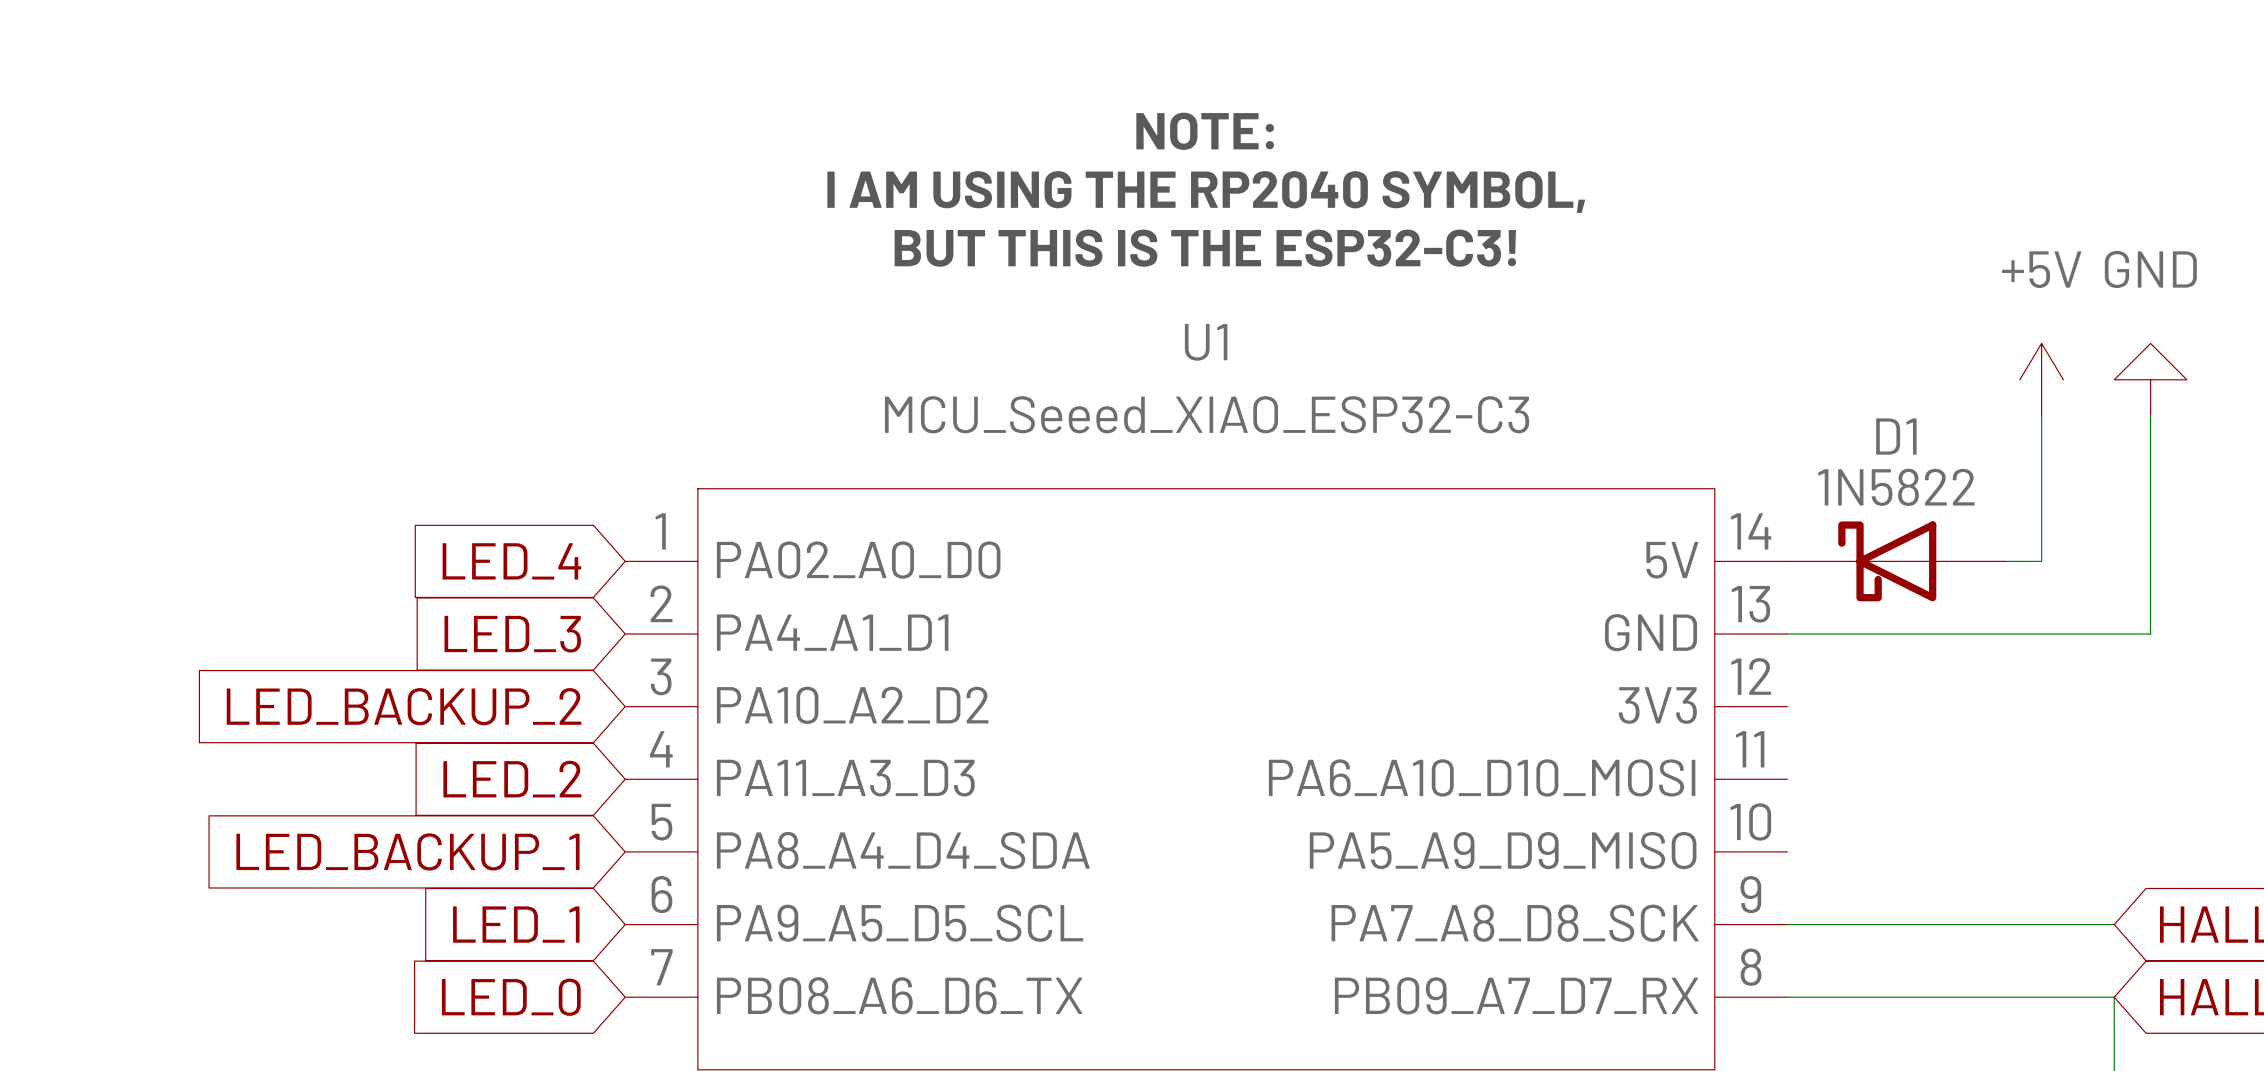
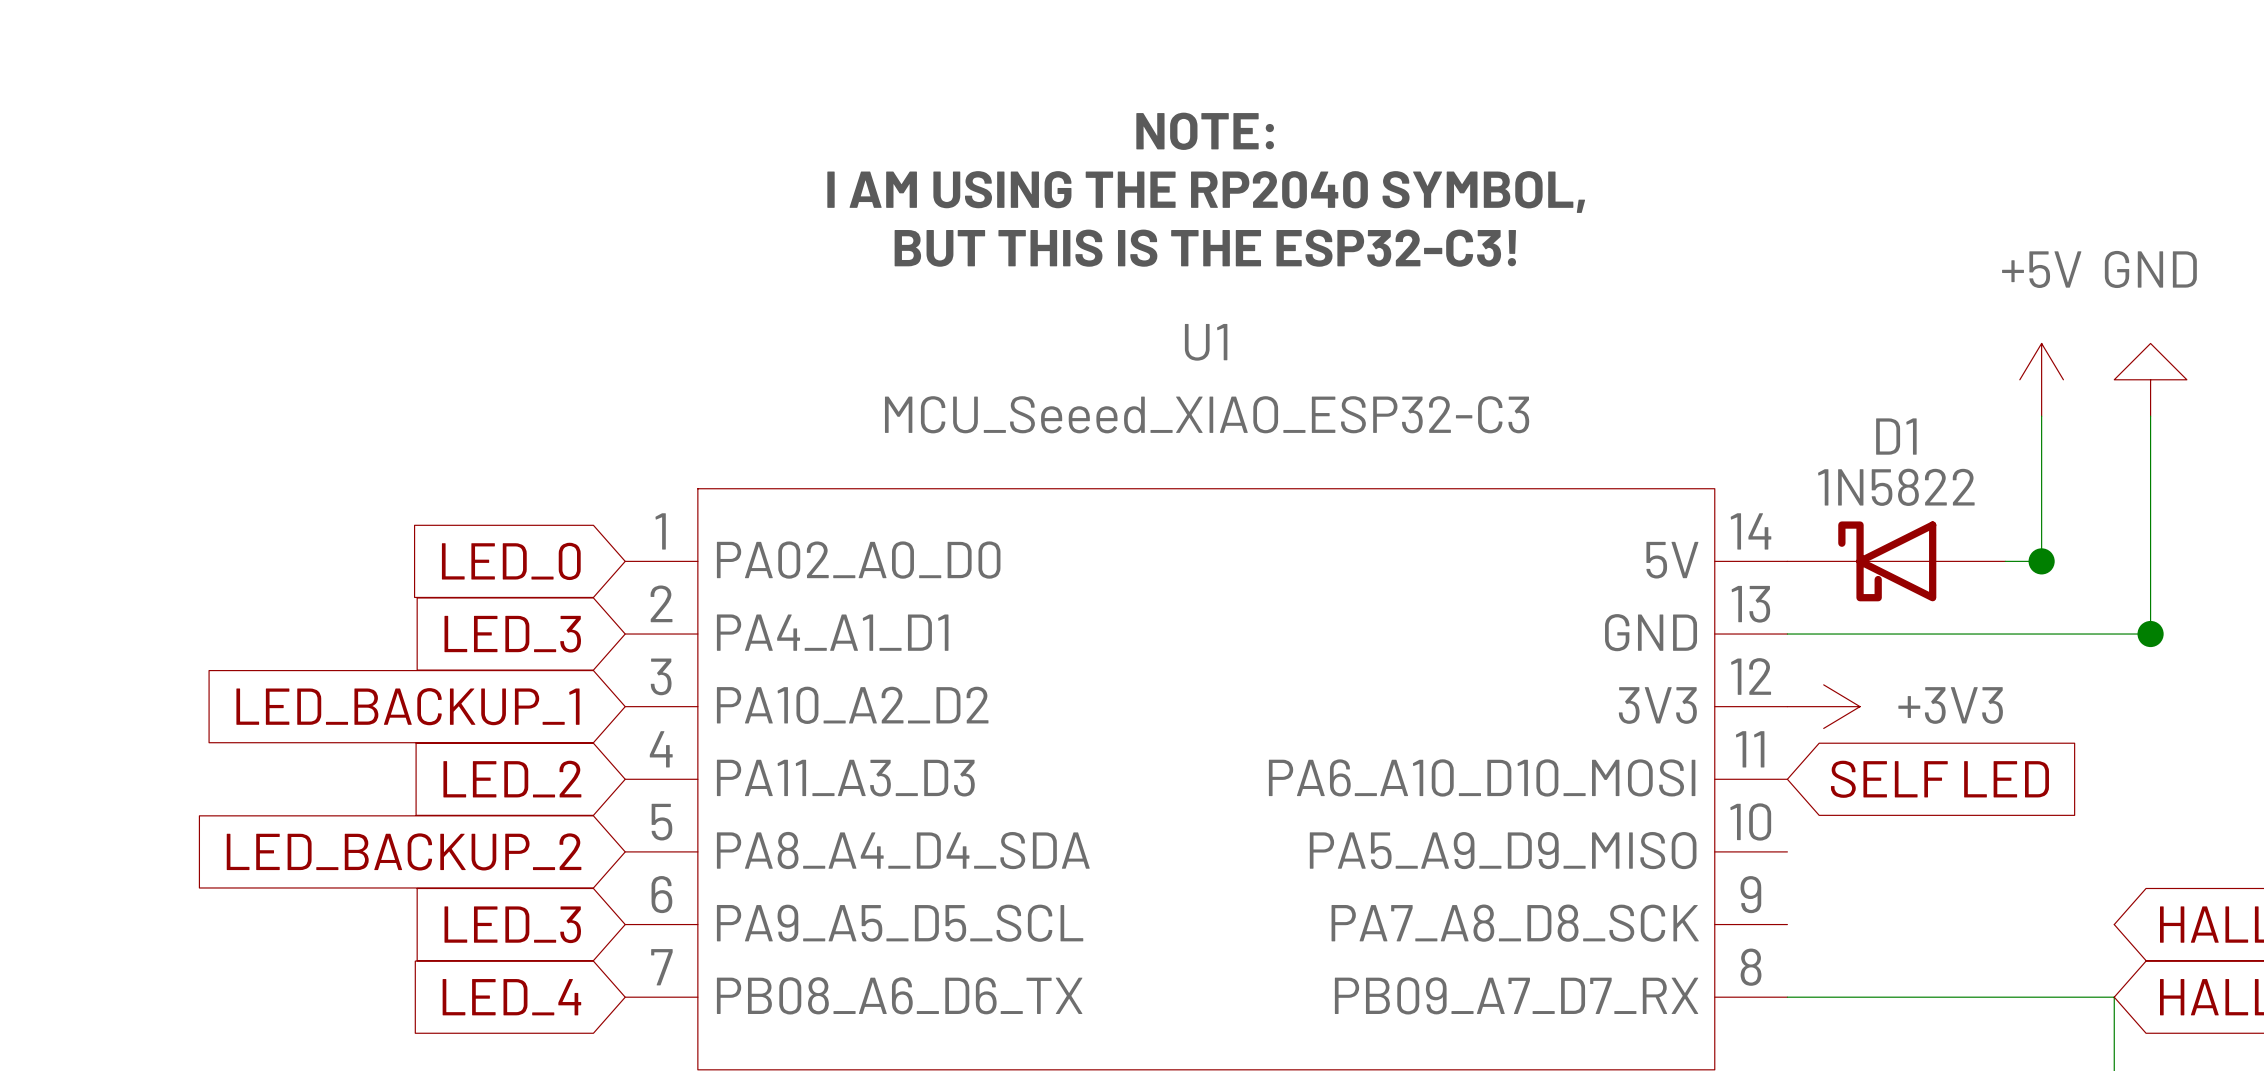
global label: LED_4 (511, 561) -> LED_0 (511, 561)
junction: none -> (2041, 561)
junction: none -> (2150, 634)
global label: LED_BACKUP_2 (404, 706) -> LED_BACKUP_1 (407, 706)
power symbol: none -> +3V3 (1823, 706)
global label: none -> SELF LED (1939, 779)
global label: LED_BACKUP_1 (407, 851) -> LED_BACKUP_2 (404, 851)
global label: LED_1 (516, 924) -> LED_3 (512, 924)
wire: (1787, 924) (2114, 924) -> none
global label: LED_0 (511, 997) -> LED_4 (511, 997)

